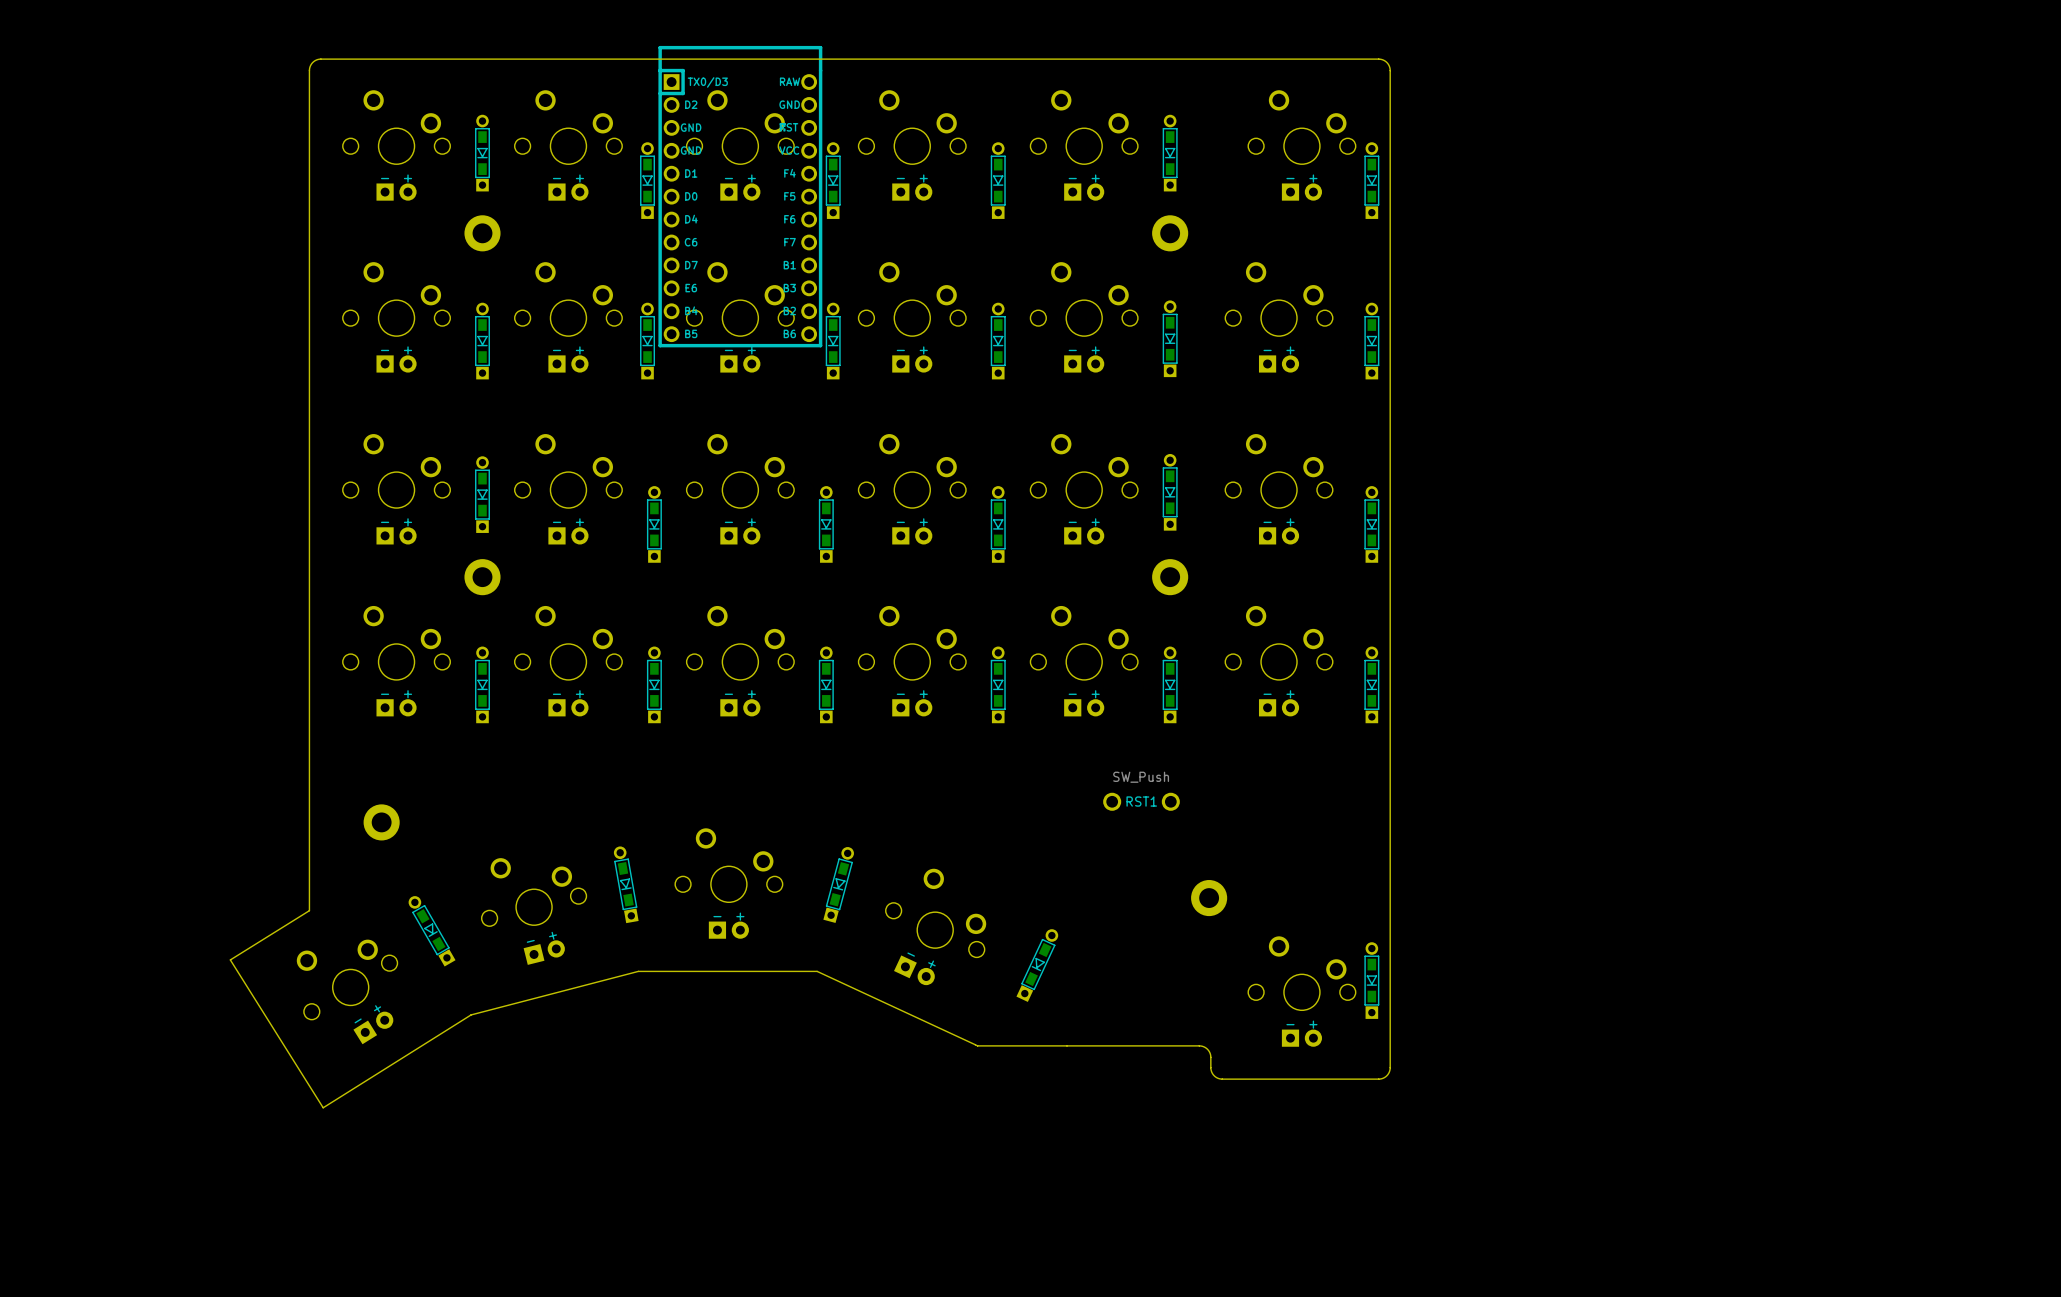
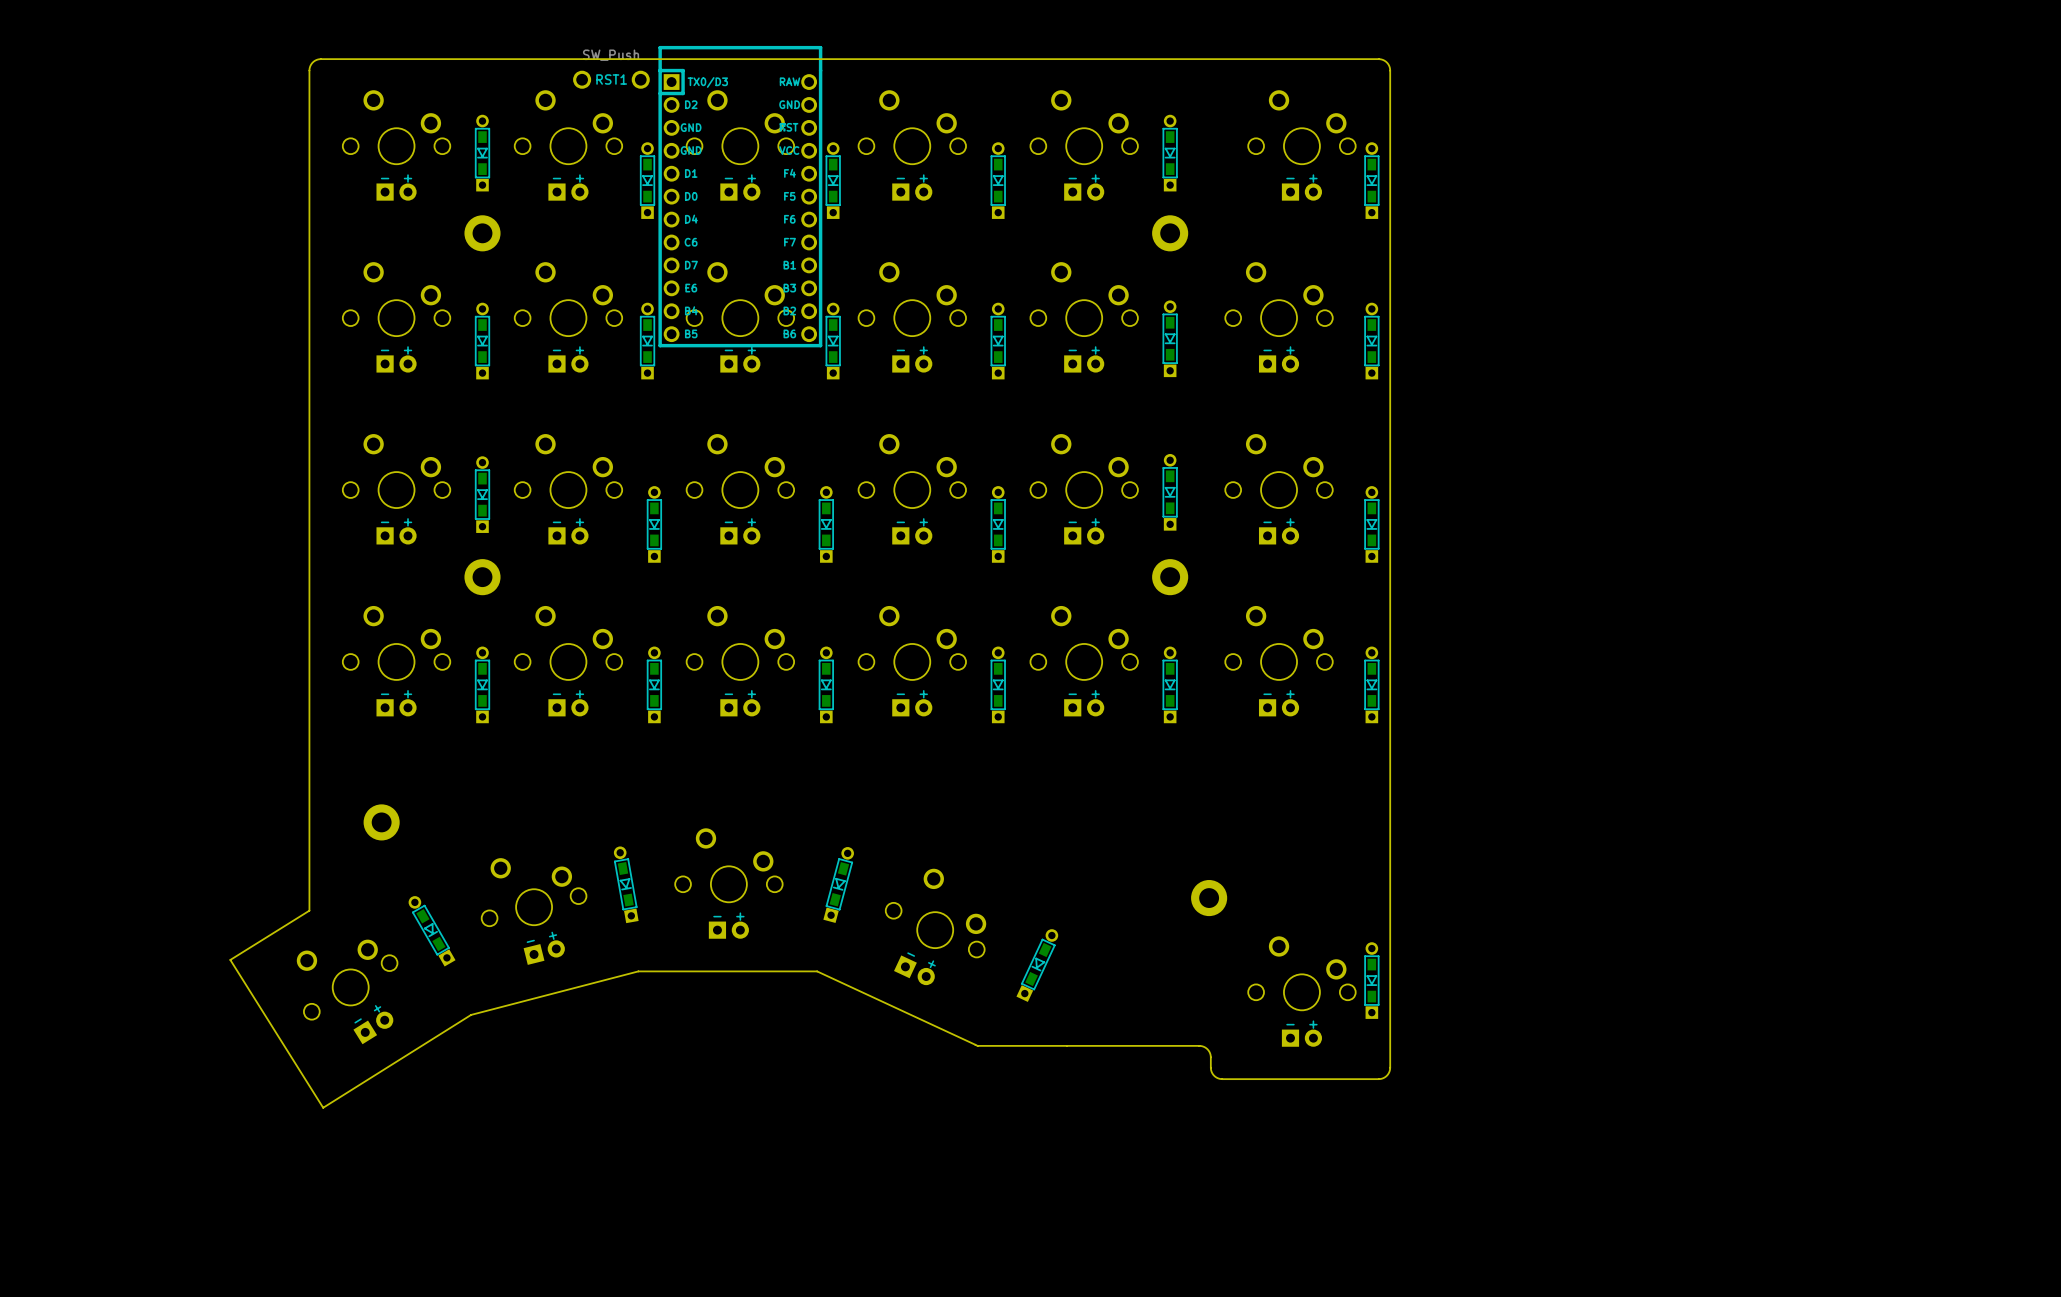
RST1 position: (1141, 801) -> (611, 79)

